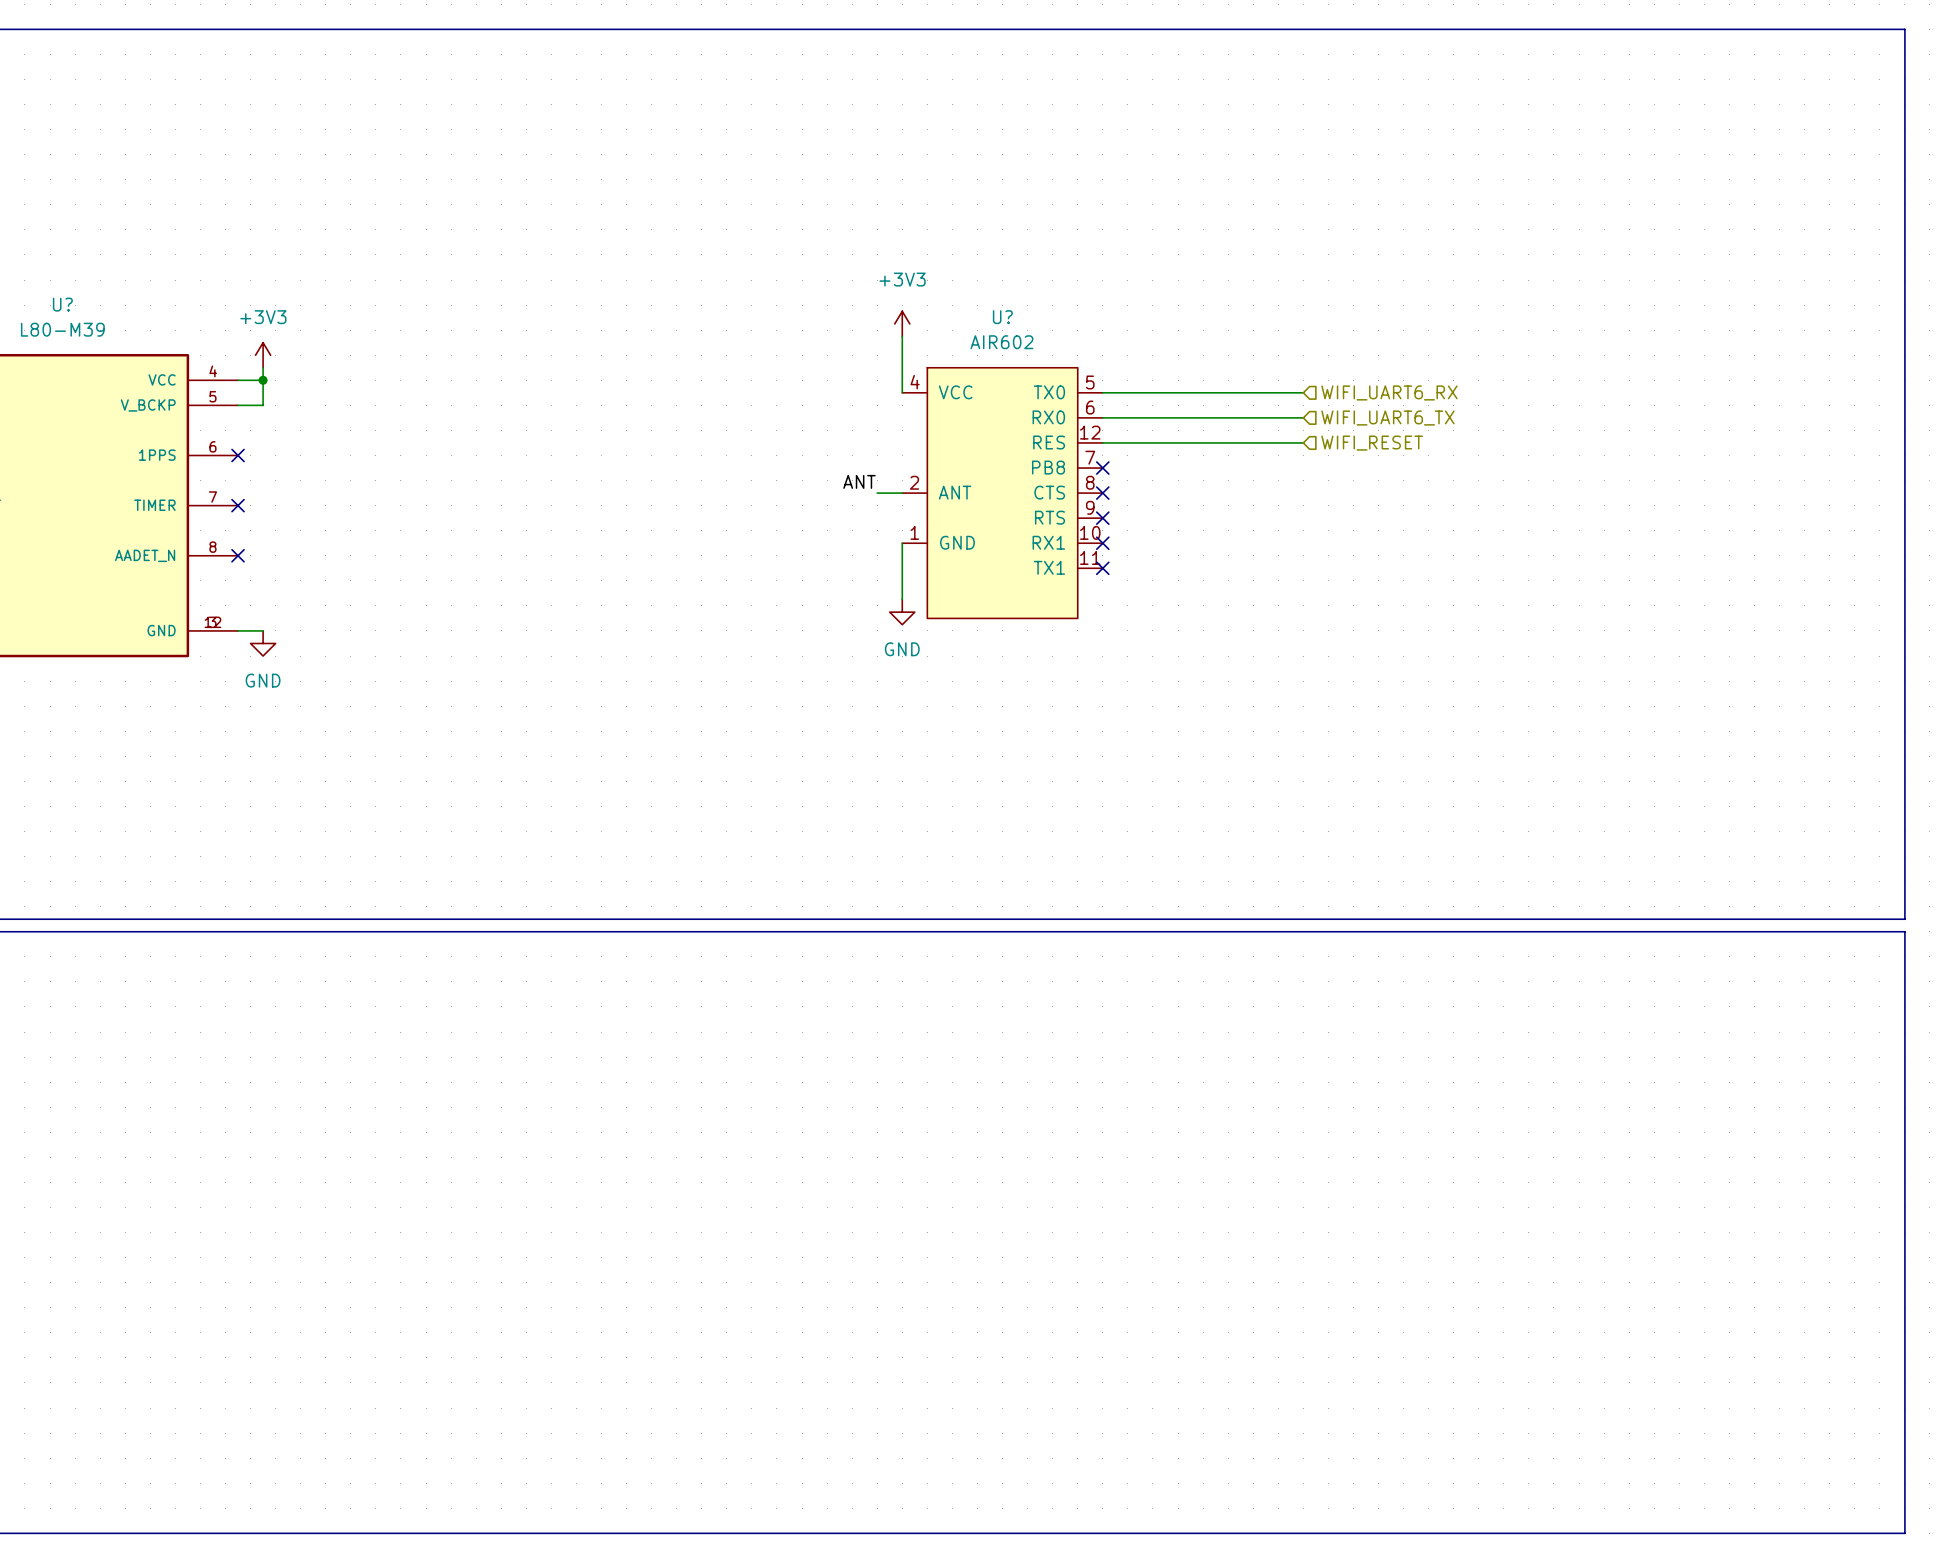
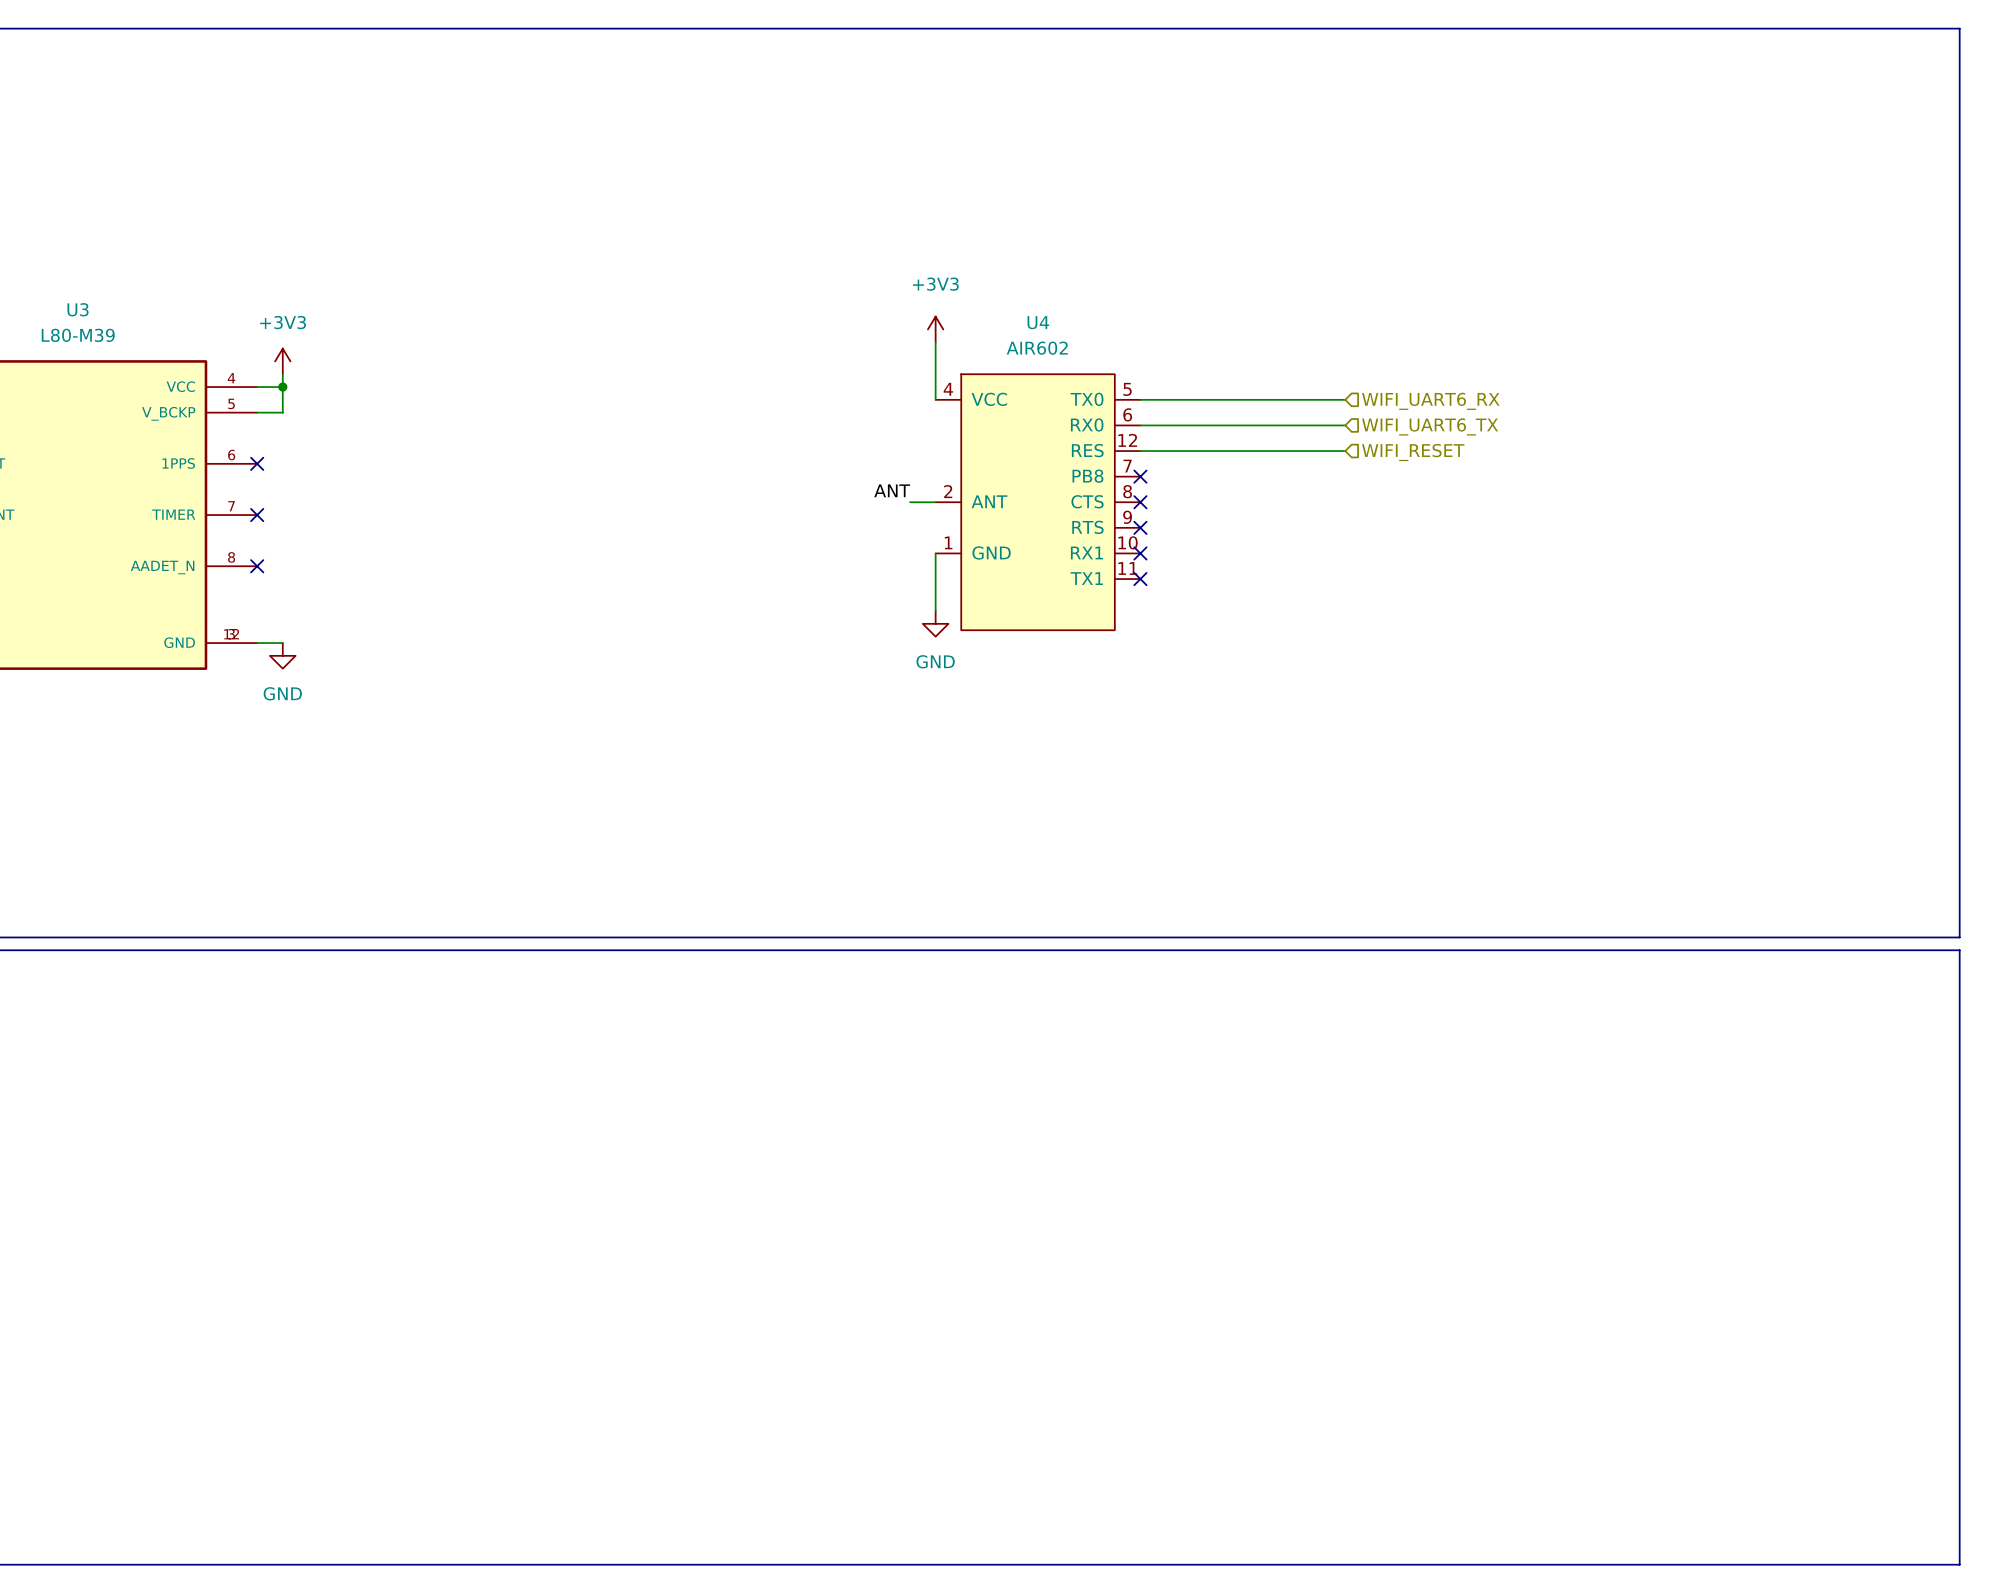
U? name: U? (62, 304) -> U3 (78, 309)
U? name: U? (1002, 317) -> U4 (1038, 322)

